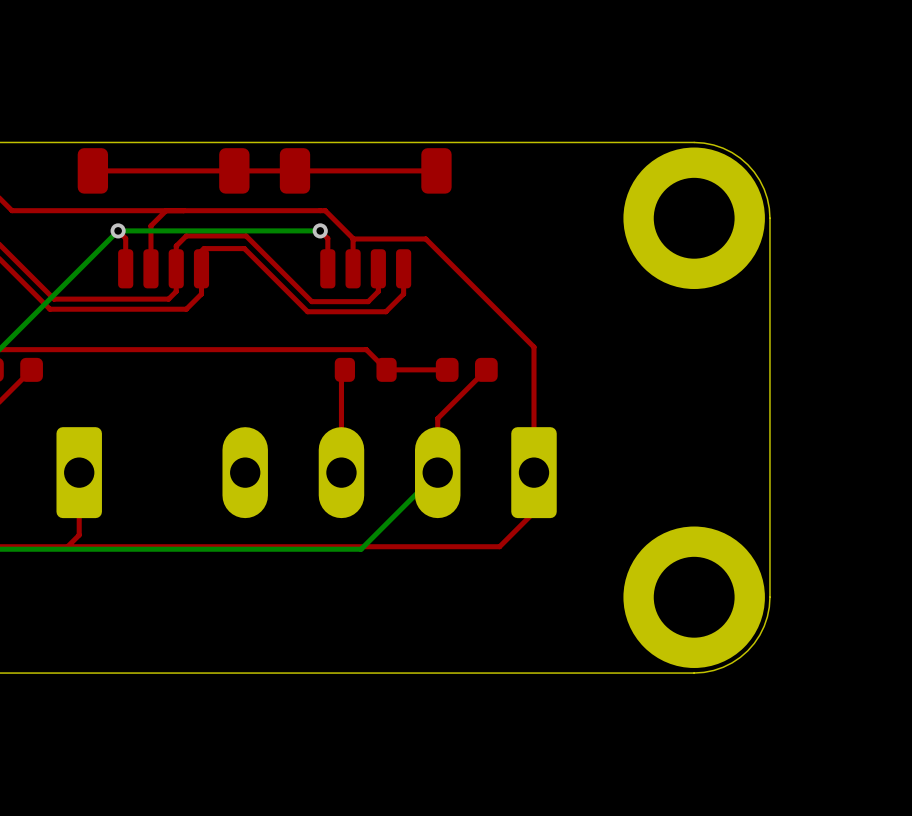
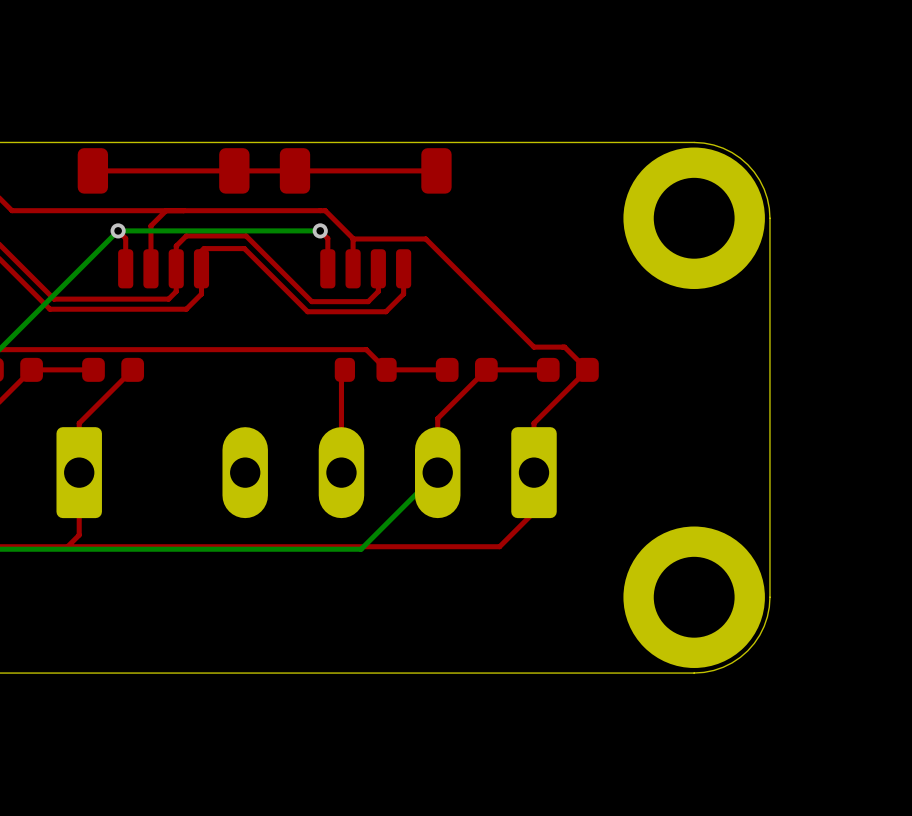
top track: (533, 347) (533, 423) -> (533, 347) (564, 347) (587, 369) (533, 423)
top track: none -> (93, 369) (31, 369)
part: none -> (113, 369)
top track: none -> (132, 369) (79, 423) (79, 472)
top track: none -> (548, 369) (486, 369)
part: none -> (567, 369)

